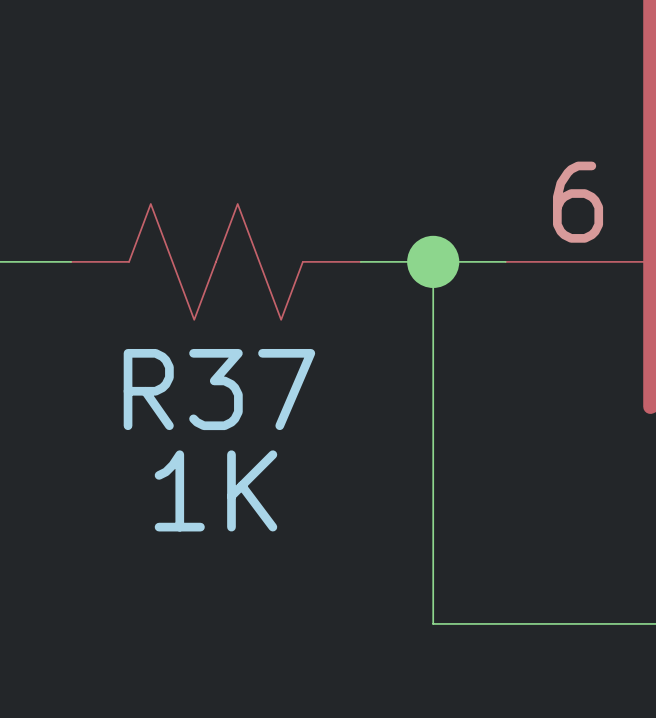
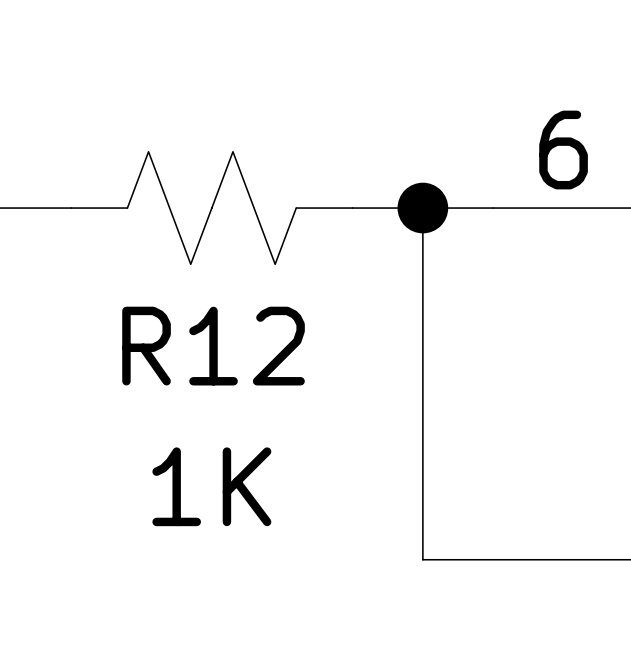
R37 name: R37 (219, 389) -> R12 (213, 346)
R37 value position: 1K (215, 490) -> 1K (211, 486)

